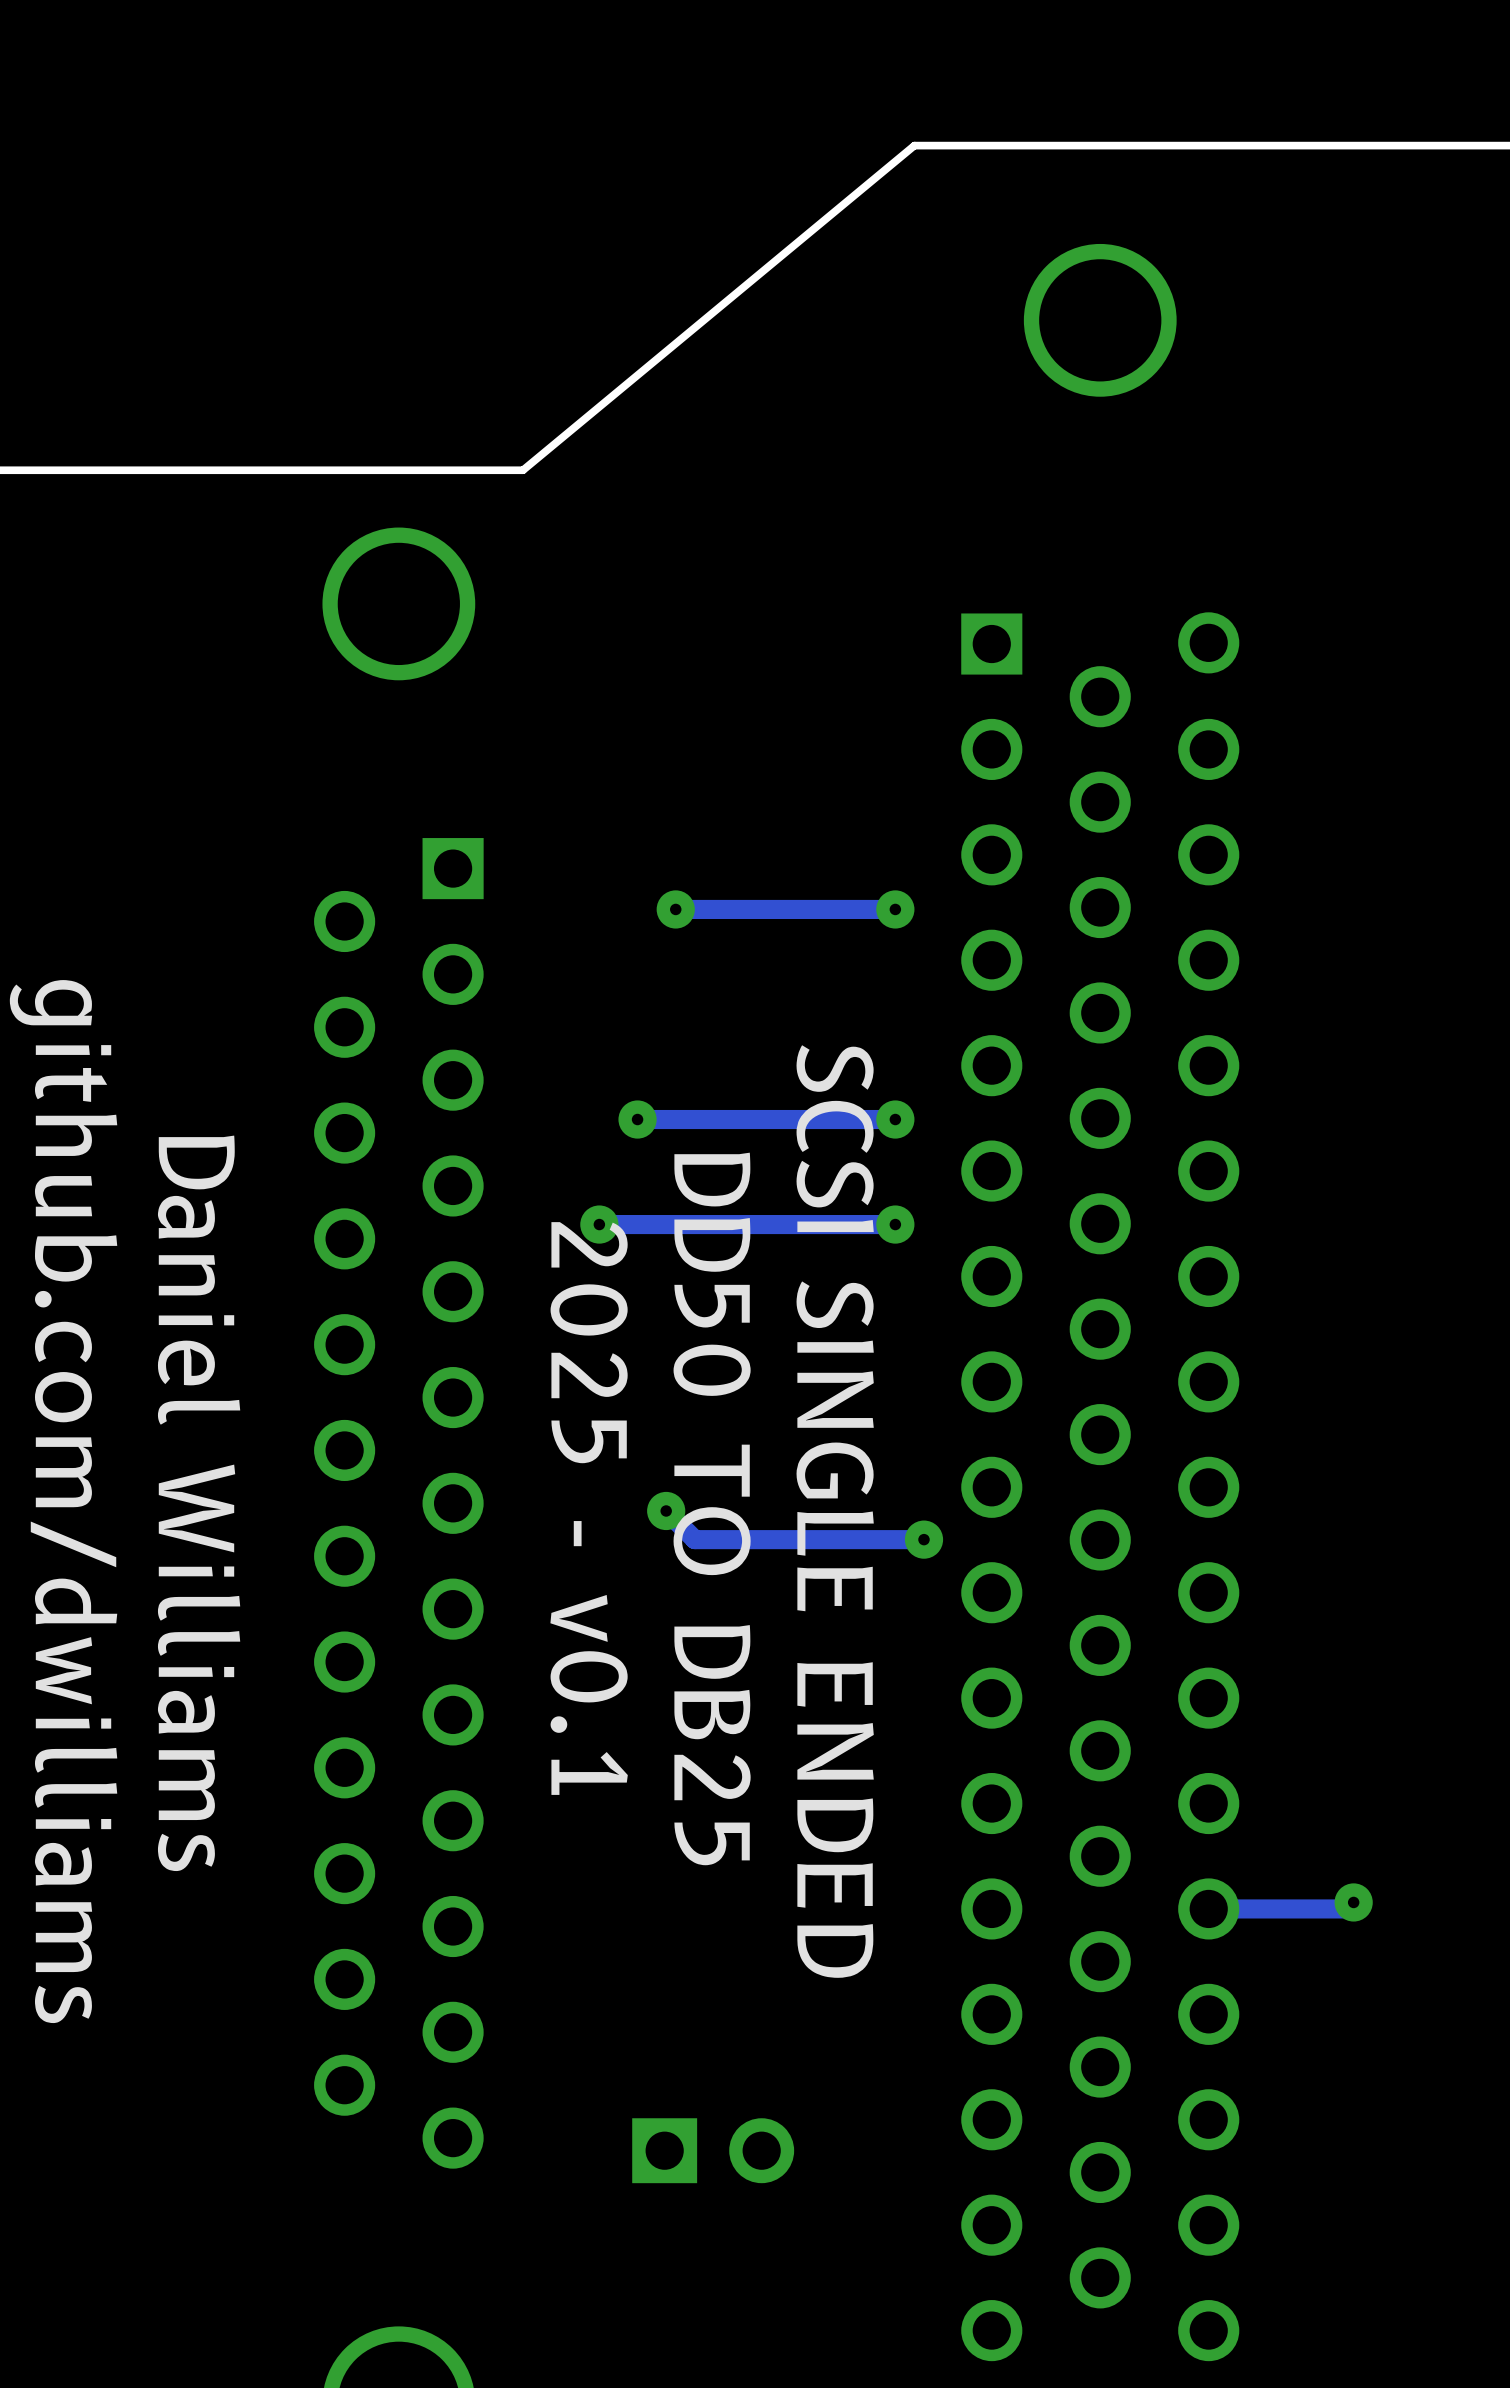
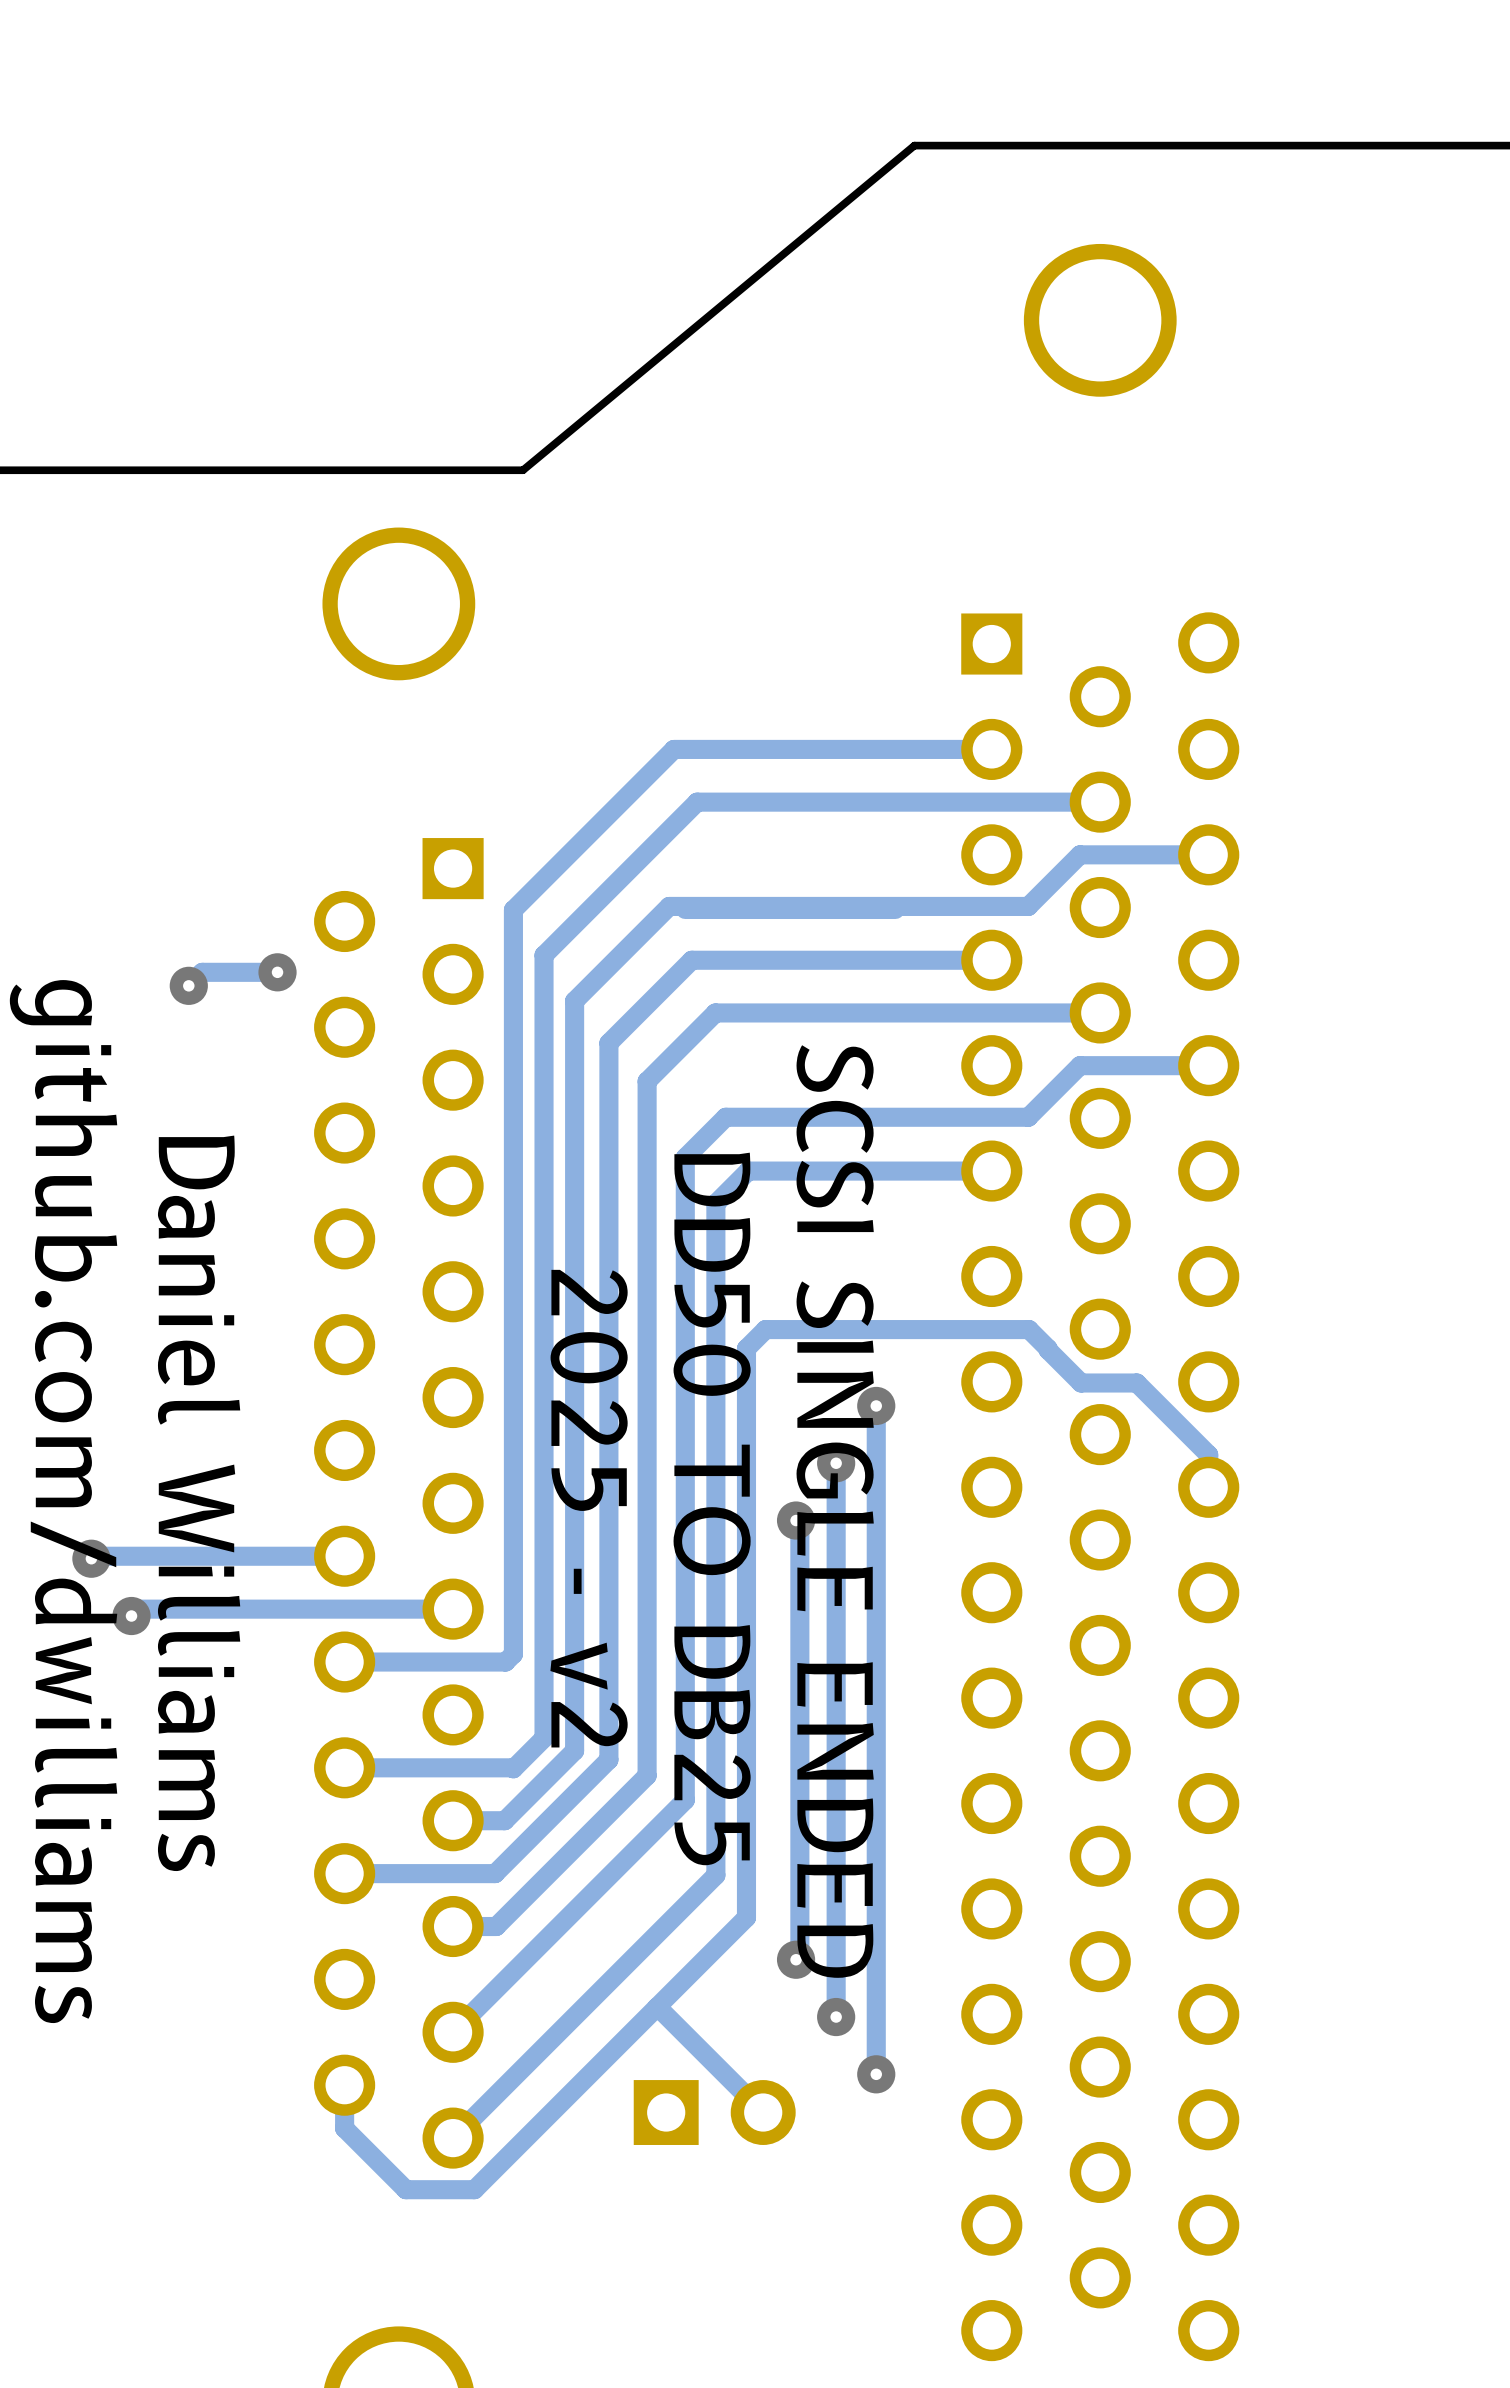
track: none -> (991, 749) (673, 749) (513, 909) (513, 1654) (505, 1662) (344, 1662)
track: none -> (1100, 802) (697, 802) (544, 955) (544, 1738) (513, 1768) (344, 1767)
track: none -> (1208, 854) (1079, 854) (1028, 906) (669, 906) (574, 1001) (574, 1750) (504, 1820) (453, 1820)
via: (675, 909) -> none
via: (895, 909) -> none
track: none -> (991, 960) (691, 960) (608, 1043) (608, 1759) (495, 1873) (344, 1873)
track: none -> (277, 972) (202, 972) (188, 985)
via: none -> (277, 972)
via: none -> (188, 985)
track: none -> (1100, 1012) (715, 1012) (647, 1081) (647, 1775) (496, 1926) (453, 1926)
track: none -> (1208, 1065) (1079, 1065) (1028, 1117) (725, 1117) (685, 1157) (685, 1800) (453, 2032)
via: (637, 1119) -> none
track: (895, 1119) (647, 1119) -> none
via: (895, 1119) -> none
track: none -> (991, 1171) (748, 1171) (715, 1203) (715, 1875) (453, 2138)
via: (599, 1224) -> none
track: (895, 1224) (608, 1224) -> none
via: (895, 1224) -> none
track: none -> (876, 1405) (876, 2074)
via: none -> (876, 1405)
track: none -> (836, 1463) (836, 2017)
via: none -> (836, 1463)
track: none -> (1208, 1487) (1208, 1454) (1136, 1383) (1081, 1383) (1029, 1329) (765, 1329) (746, 1348) (746, 1917) (474, 2189) (405, 2189) (344, 2128) (344, 2085)
text: 2025 - v0.1 (589, 1508) -> 2025 - v2 (589, 1508)
track: (666, 1510) (694, 1539) (924, 1539) -> none
via: (666, 1510) -> none
track: none -> (796, 1520) (799, 1524) (799, 1955) (796, 1959)
via: none -> (796, 1520)
via: (924, 1539) -> none
track: none -> (344, 1556) (93, 1556) (91, 1558)
via: none -> (91, 1558)
track: none -> (453, 1609) (138, 1609) (131, 1616)
via: none -> (131, 1616)
track: (1353, 1902) (1347, 1908) (1208, 1908) -> none
via: (1353, 1902) -> none
via: none -> (796, 1959)
track: none -> (656, 2007) (763, 2112)
via: none -> (836, 2017)
via: none -> (876, 2074)
part position: (713, 2150) -> (714, 2112)

